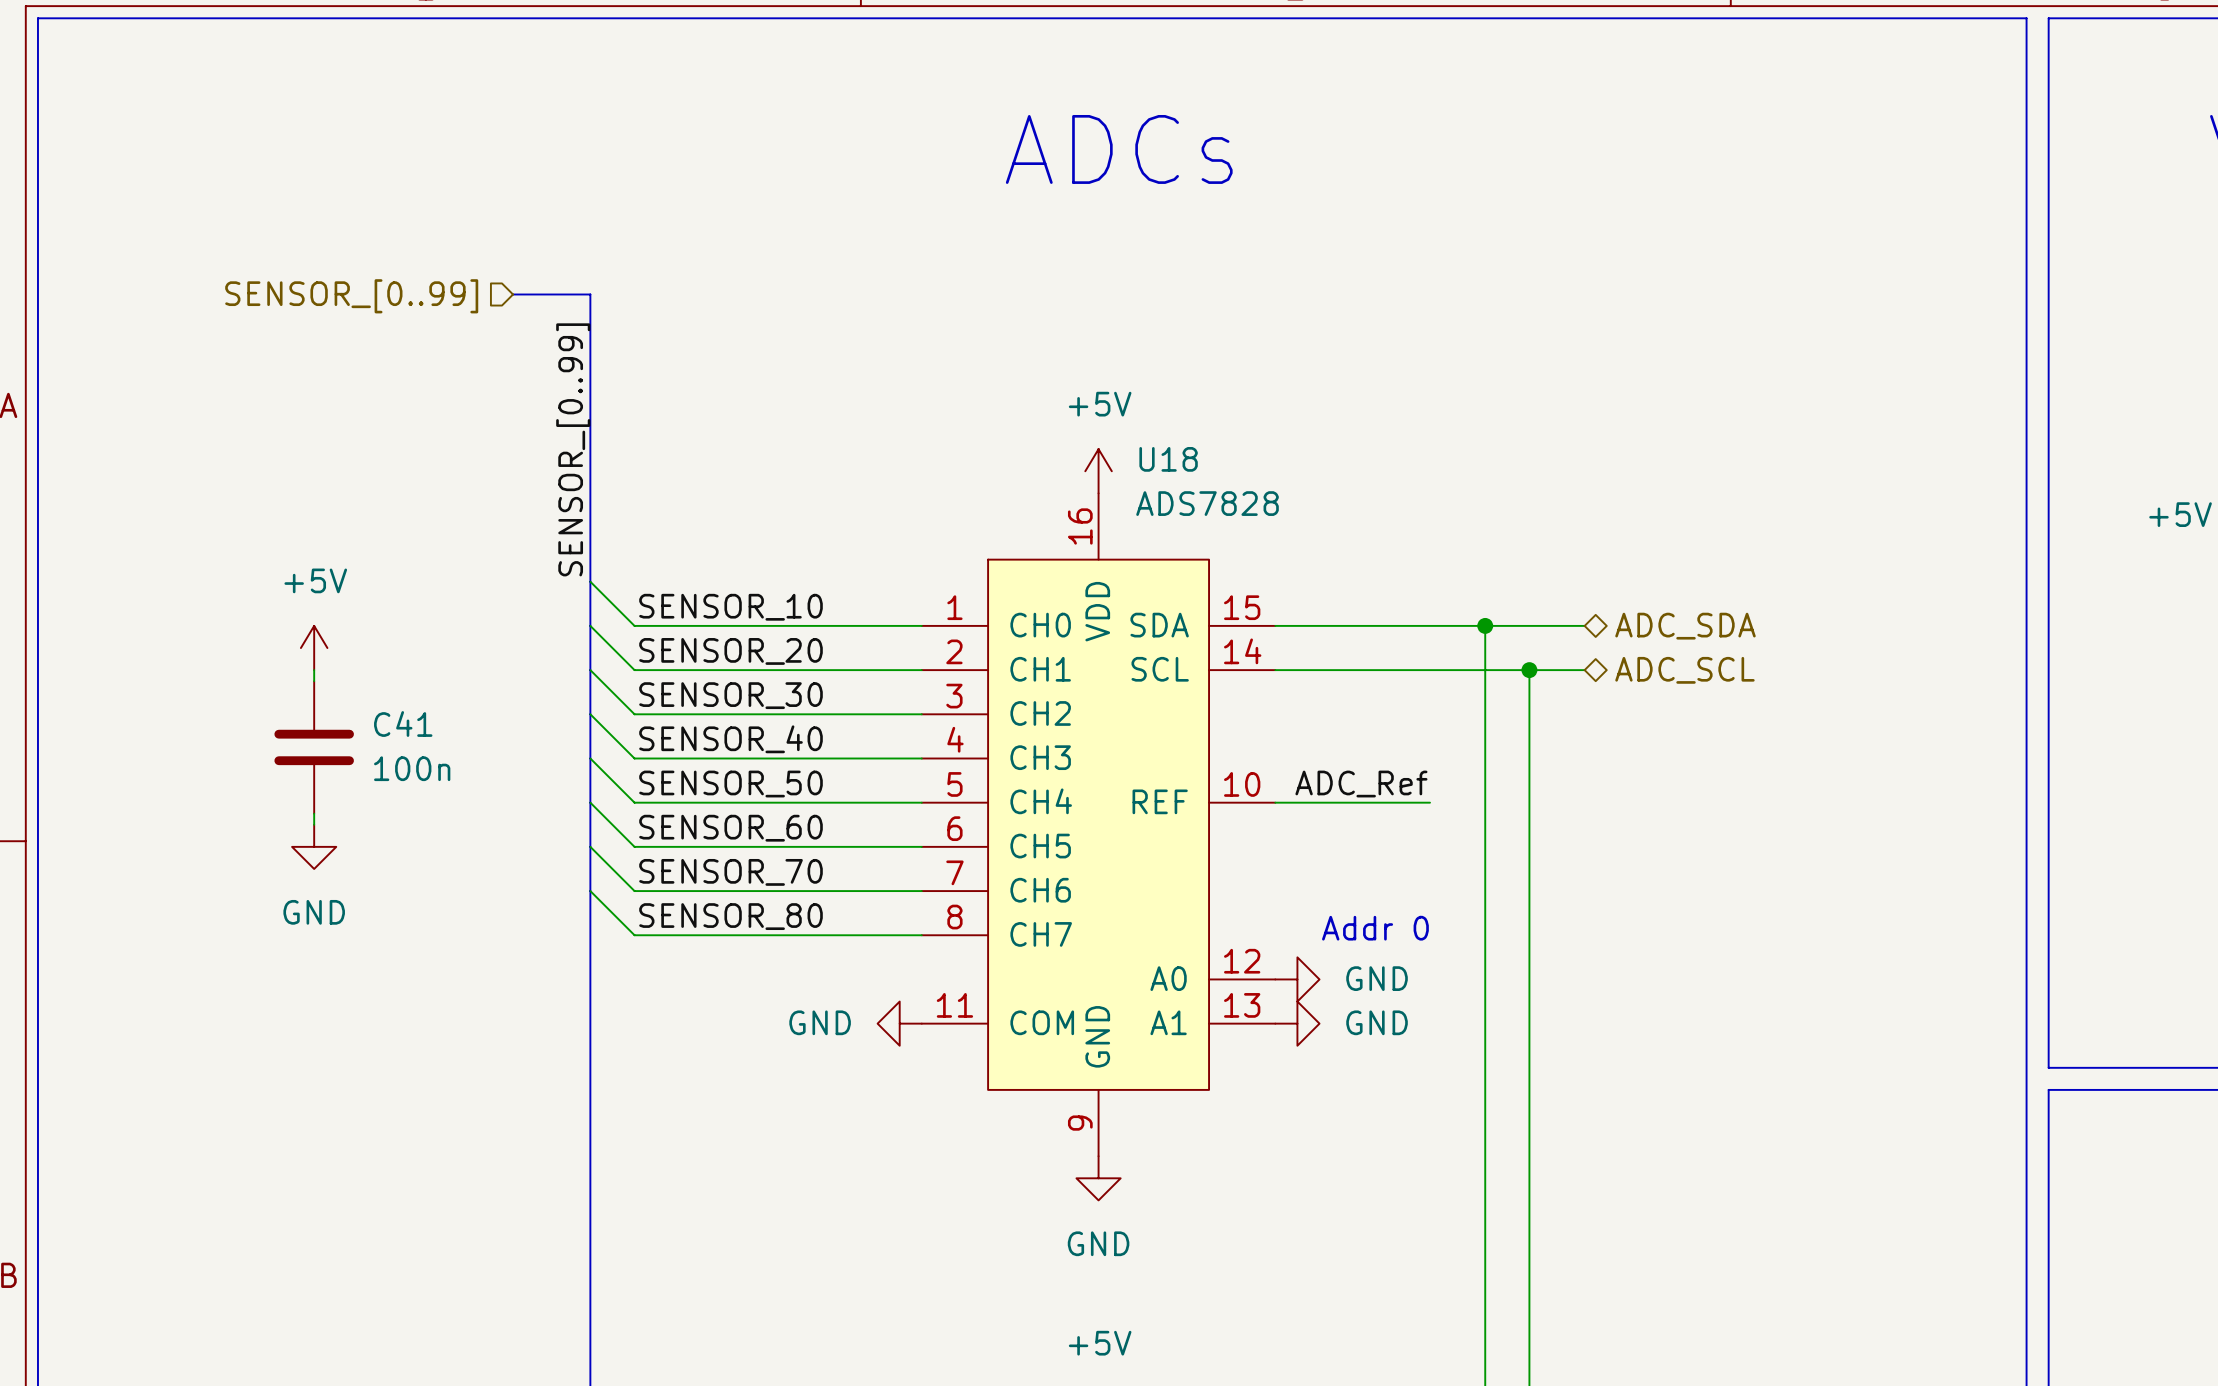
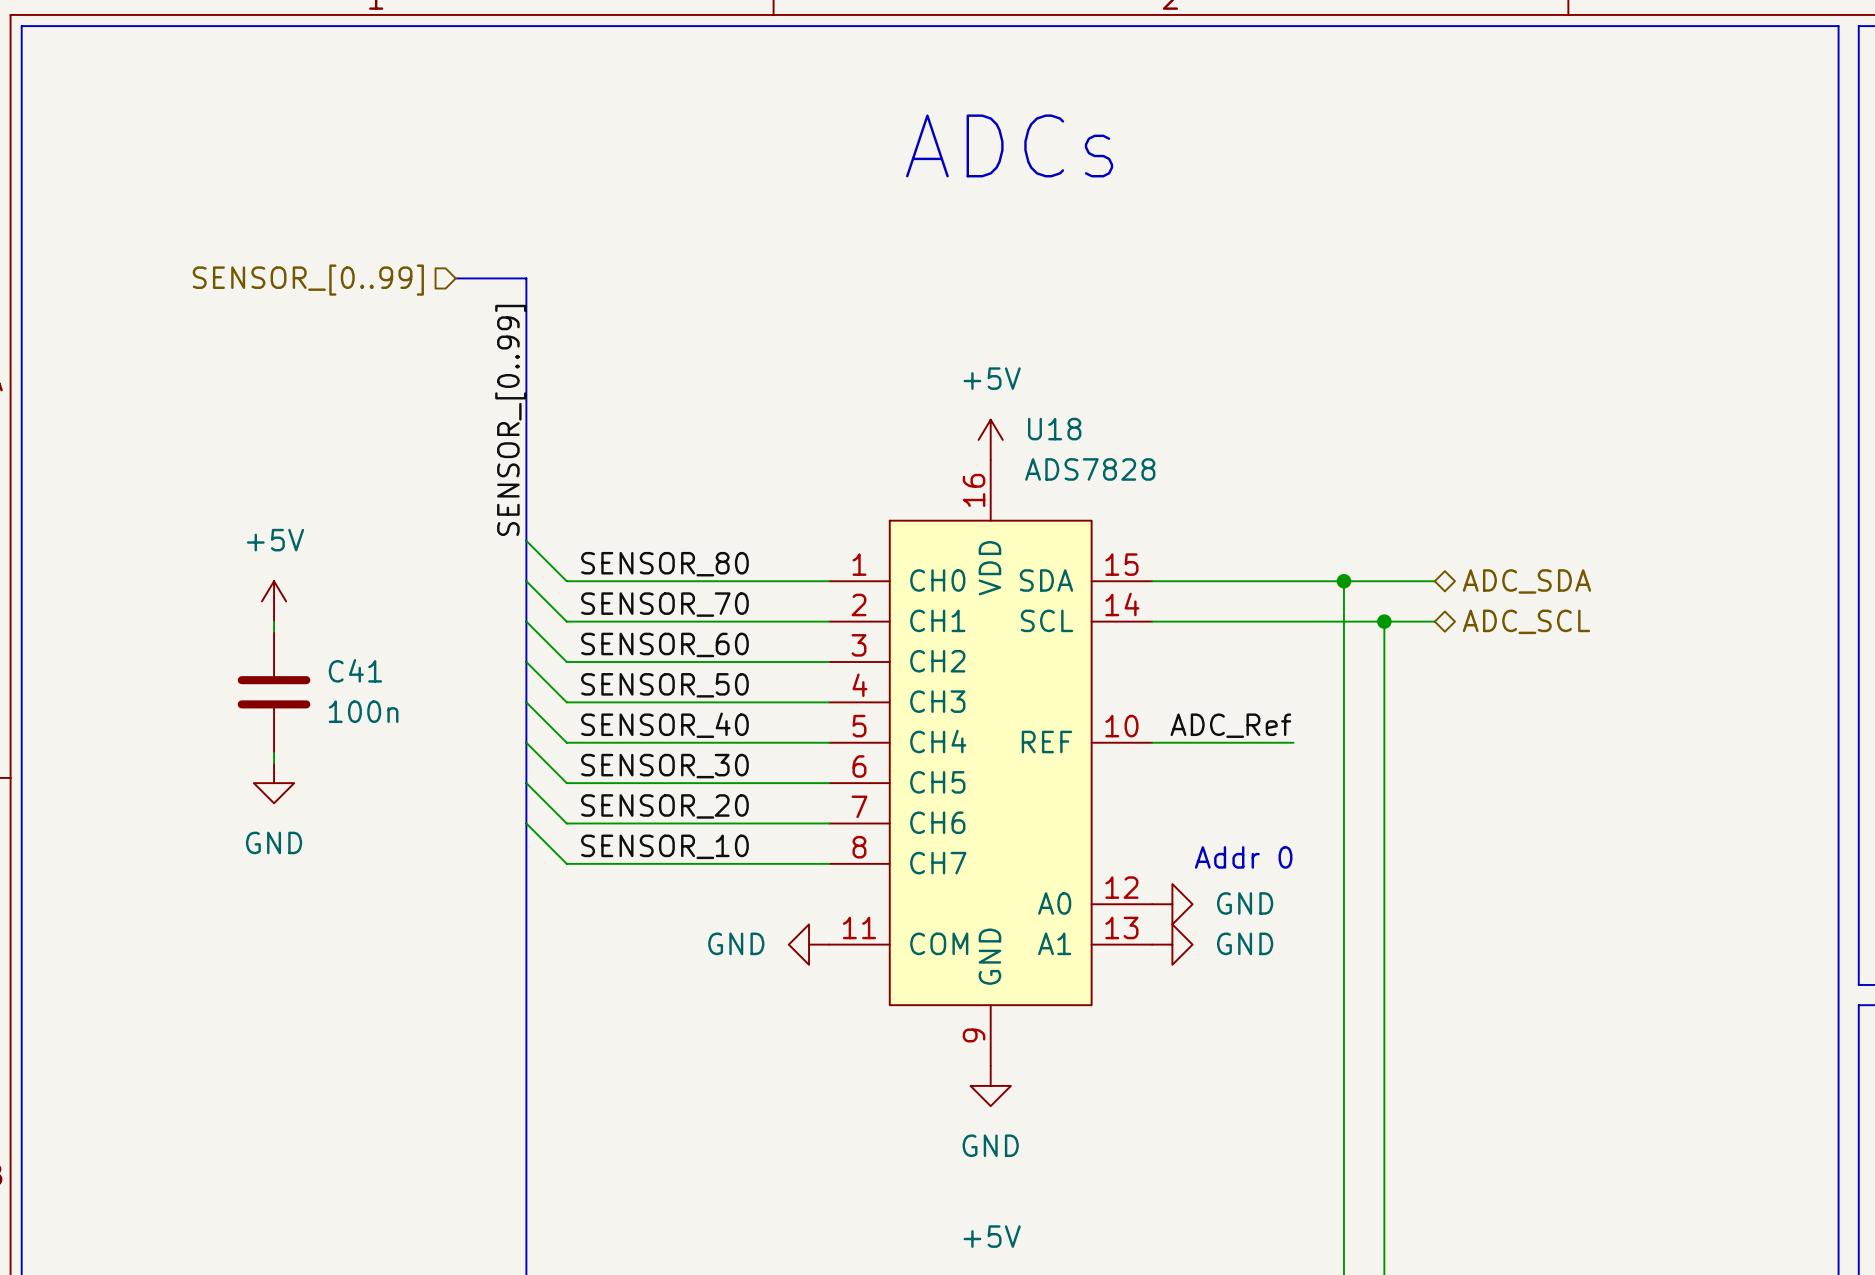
label position: SENSOR_10 (731, 607) -> SENSOR_10 (664, 846)
label position: SENSOR_20 (731, 651) -> SENSOR_20 (664, 806)
label position: SENSOR_30 (731, 695) -> SENSOR_30 (664, 766)
label position: SENSOR_40 (731, 739) -> SENSOR_40 (664, 725)
label position: SENSOR_50 (731, 784) -> SENSOR_50 (664, 685)
label position: SENSOR_60 (731, 828) -> SENSOR_60 (664, 644)
label position: SENSOR_70 (731, 872) -> SENSOR_70 (664, 604)
label position: SENSOR_80 (731, 916) -> SENSOR_80 (664, 564)

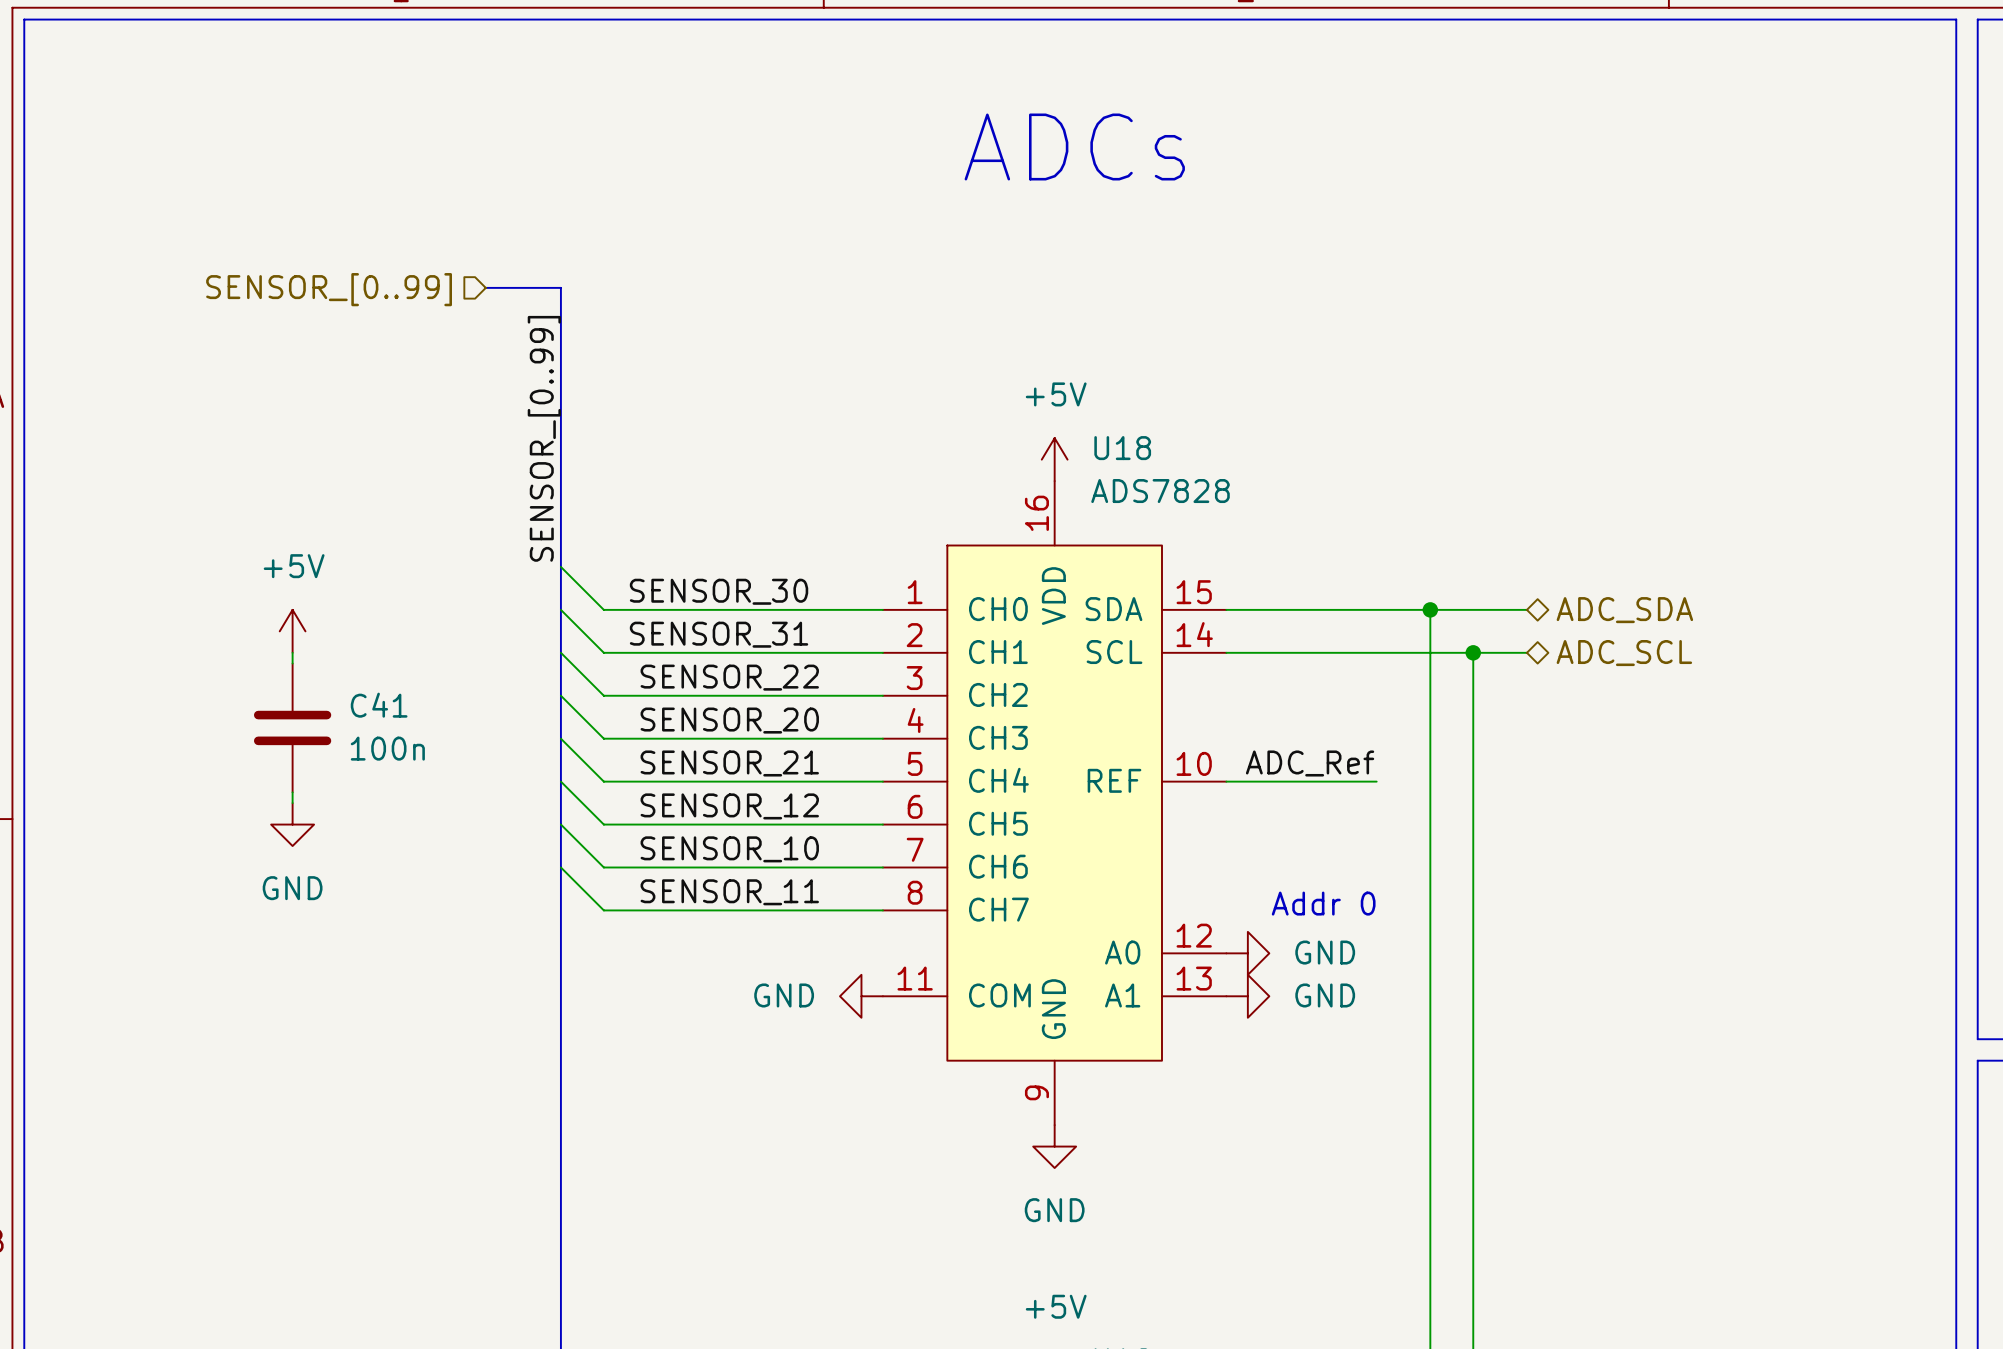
label: SENSOR_80 (664, 564) -> none
label: SENSOR_70 (664, 604) -> SENSOR_31 (719, 634)
label: SENSOR_60 (664, 644) -> SENSOR_22 (729, 677)
label: SENSOR_50 (664, 685) -> none
label: SENSOR_40 (664, 725) -> SENSOR_21 (729, 763)
label position: SENSOR_30 (664, 766) -> SENSOR_30 (719, 591)
label: none -> SENSOR_12 (729, 806)
label position: SENSOR_20 (664, 806) -> SENSOR_20 (729, 720)
label position: SENSOR_10 (664, 846) -> SENSOR_10 (729, 849)
label: none -> SENSOR_11 (729, 892)

